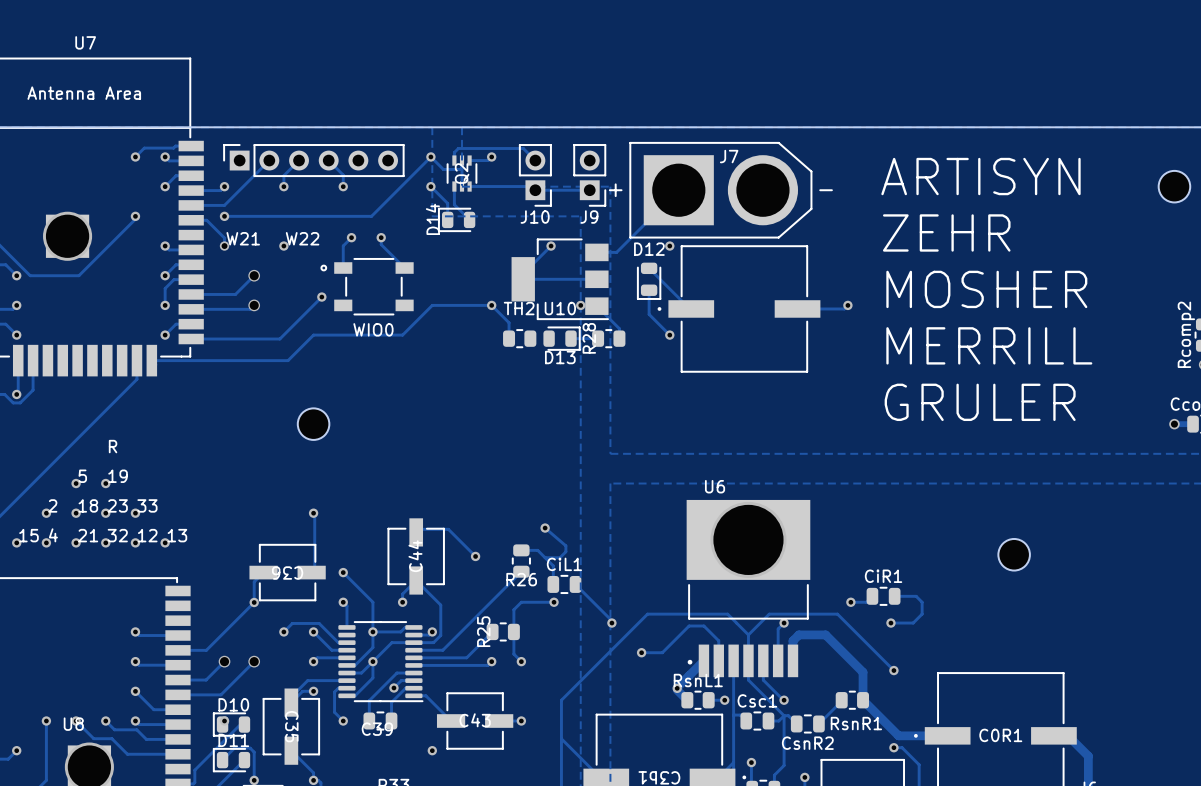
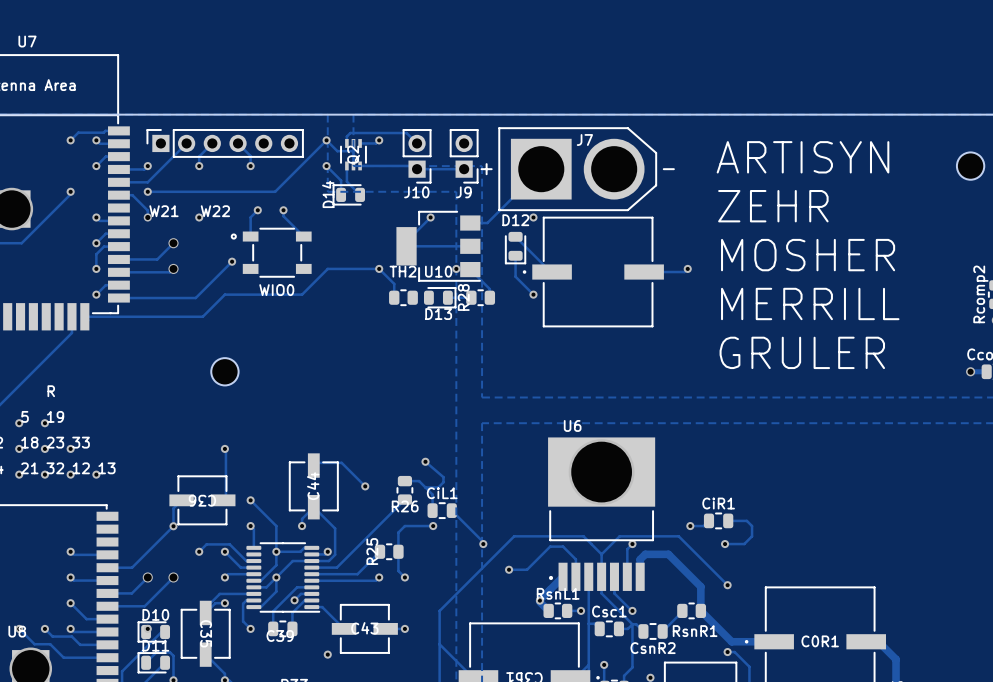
part: (1014, 554) -> none

